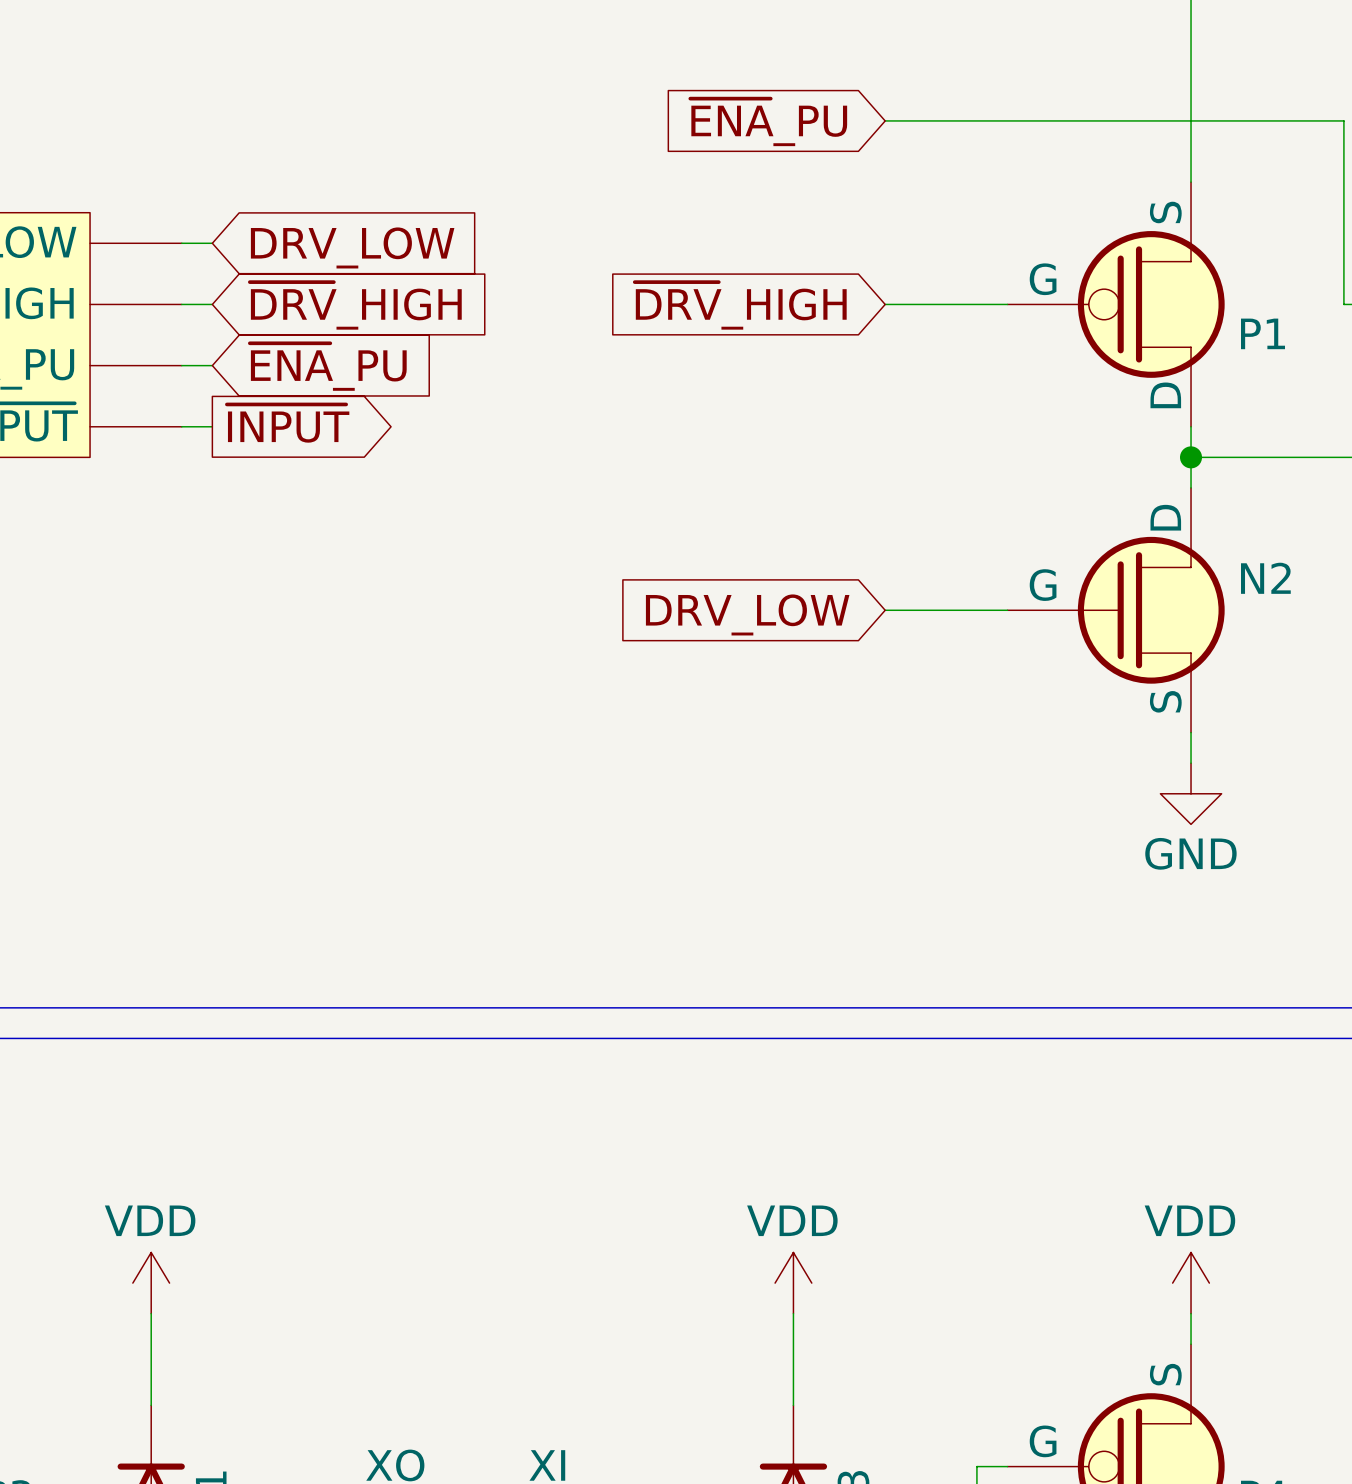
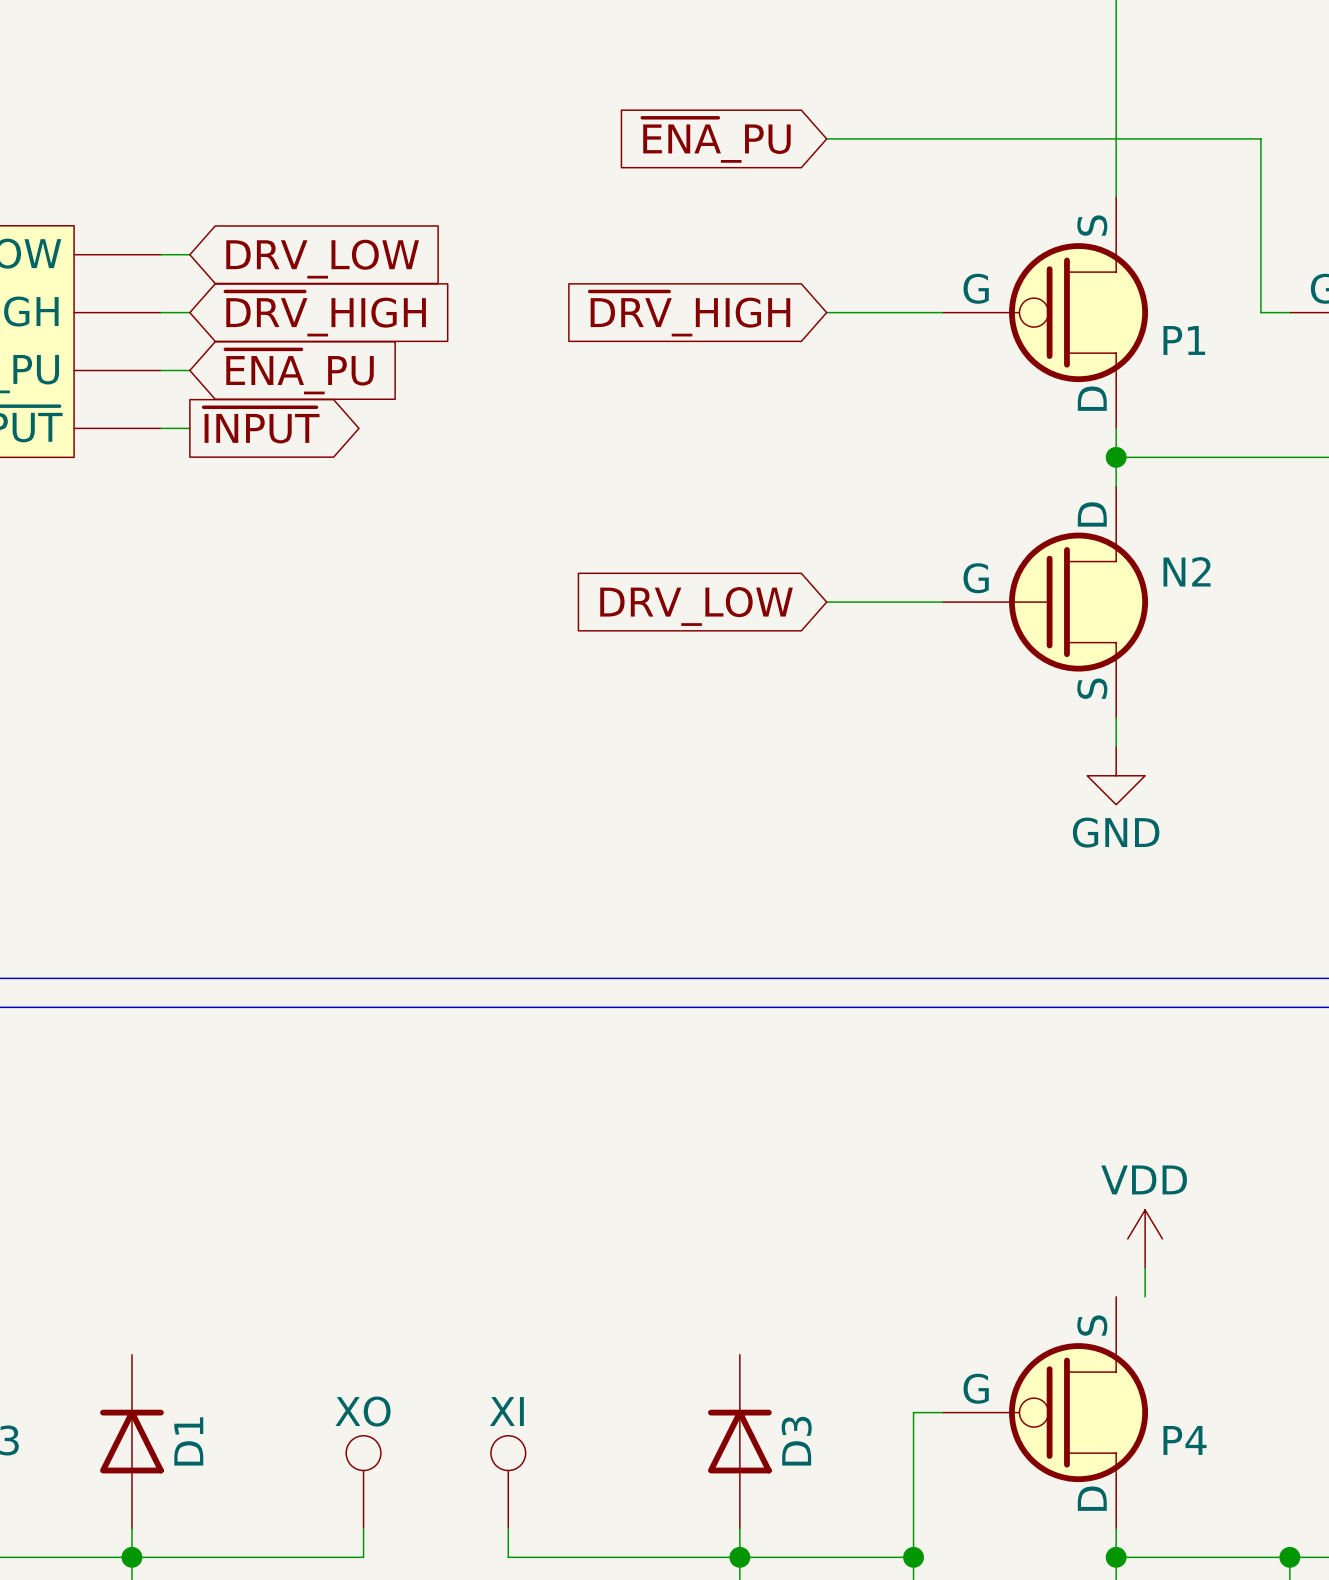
power symbol: VDD (151, 1283) -> none
power symbol: VDD (793, 1283) -> none
power symbol position: VDD (1191, 1283) -> VDD (1145, 1238)
wire: (151, 1313) (151, 1405) -> none
wire: (793, 1313) (793, 1405) -> none
wire: (1191, 1313) (1191, 1344) -> (1145, 1267) (1145, 1296)

